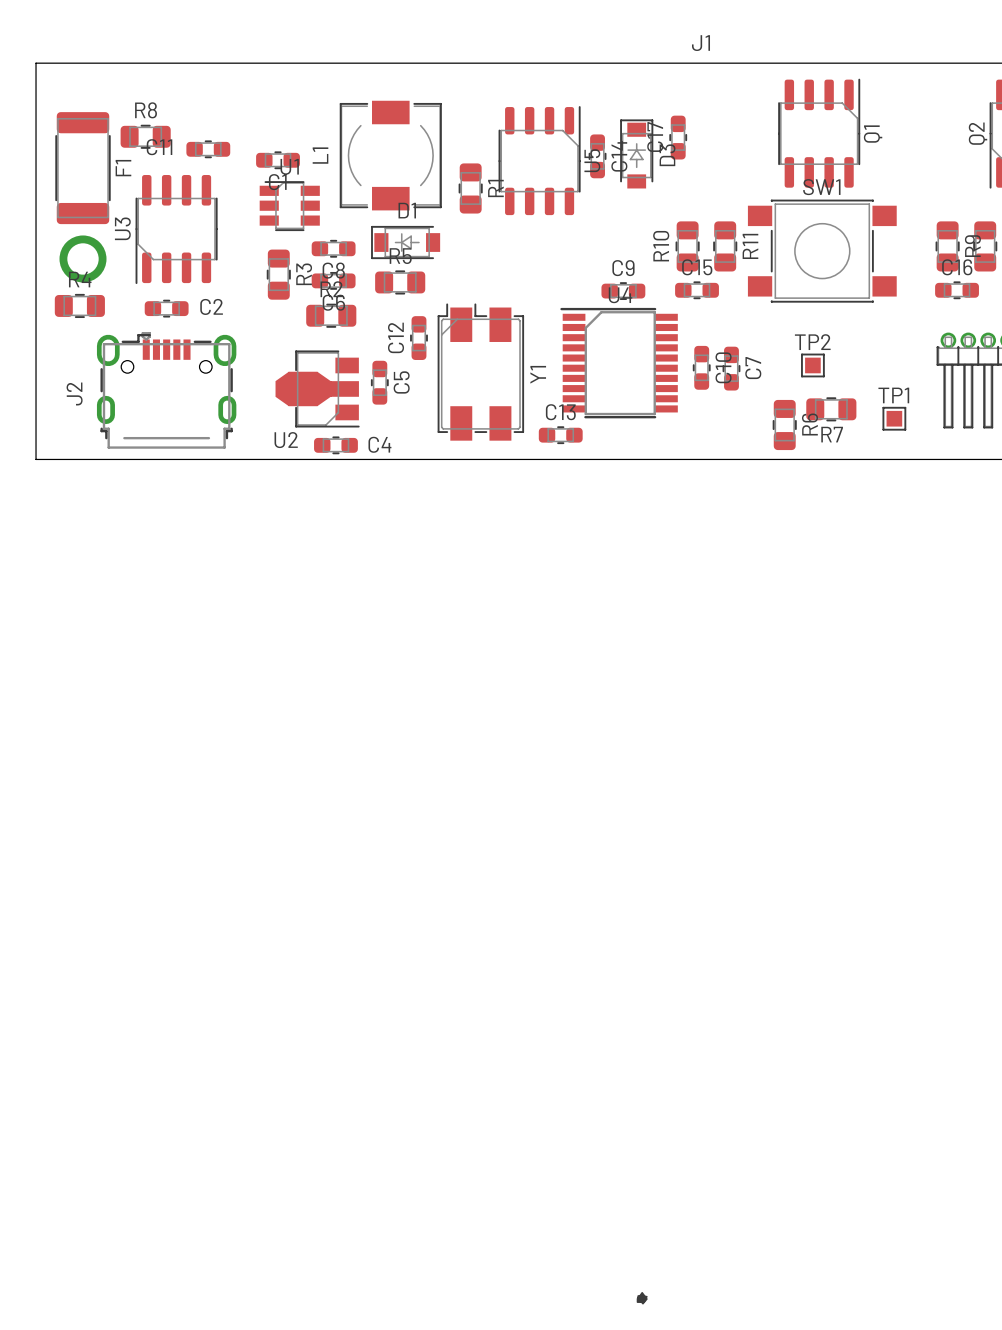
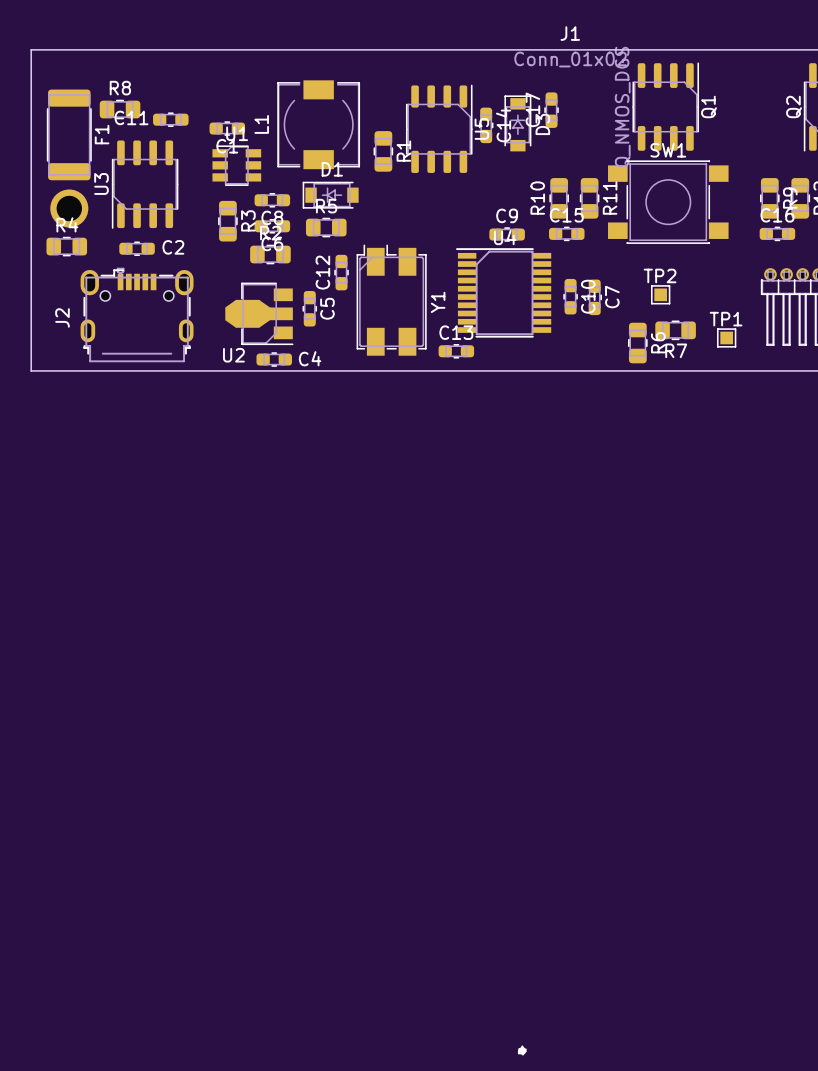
J1 value: none -> Conn_01x02 (570, 59)
Q1 value: none -> Q_NMOS_DGS (622, 106)

